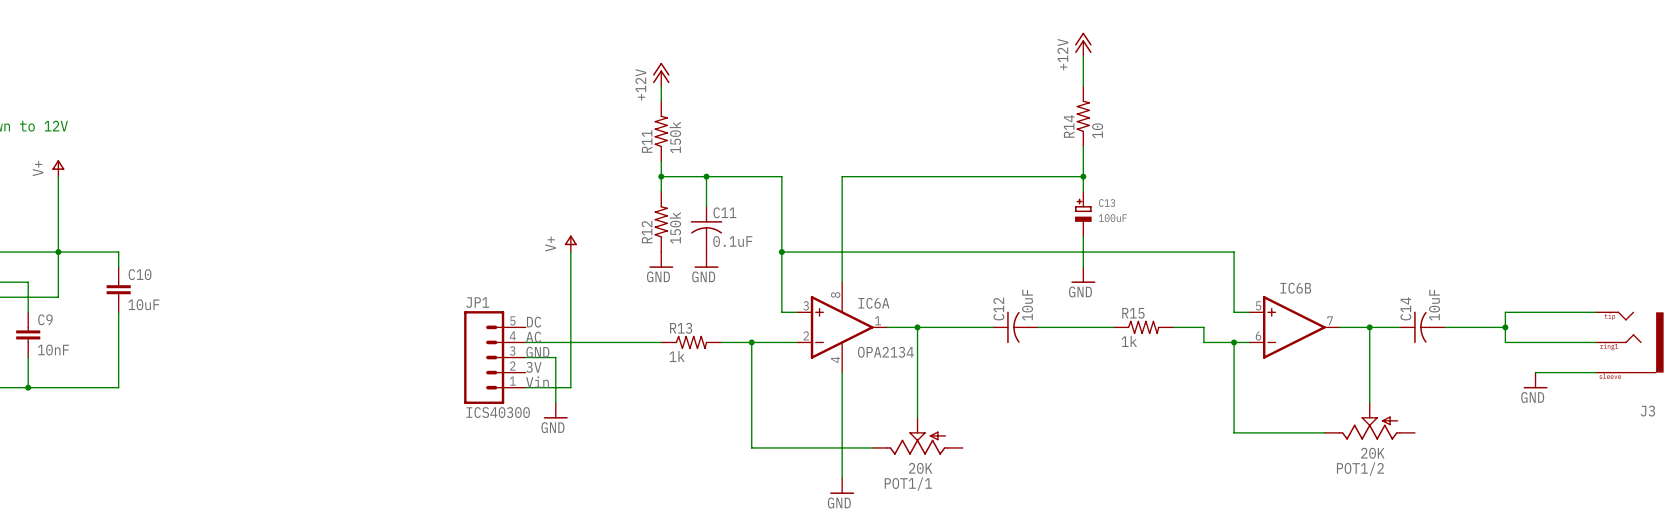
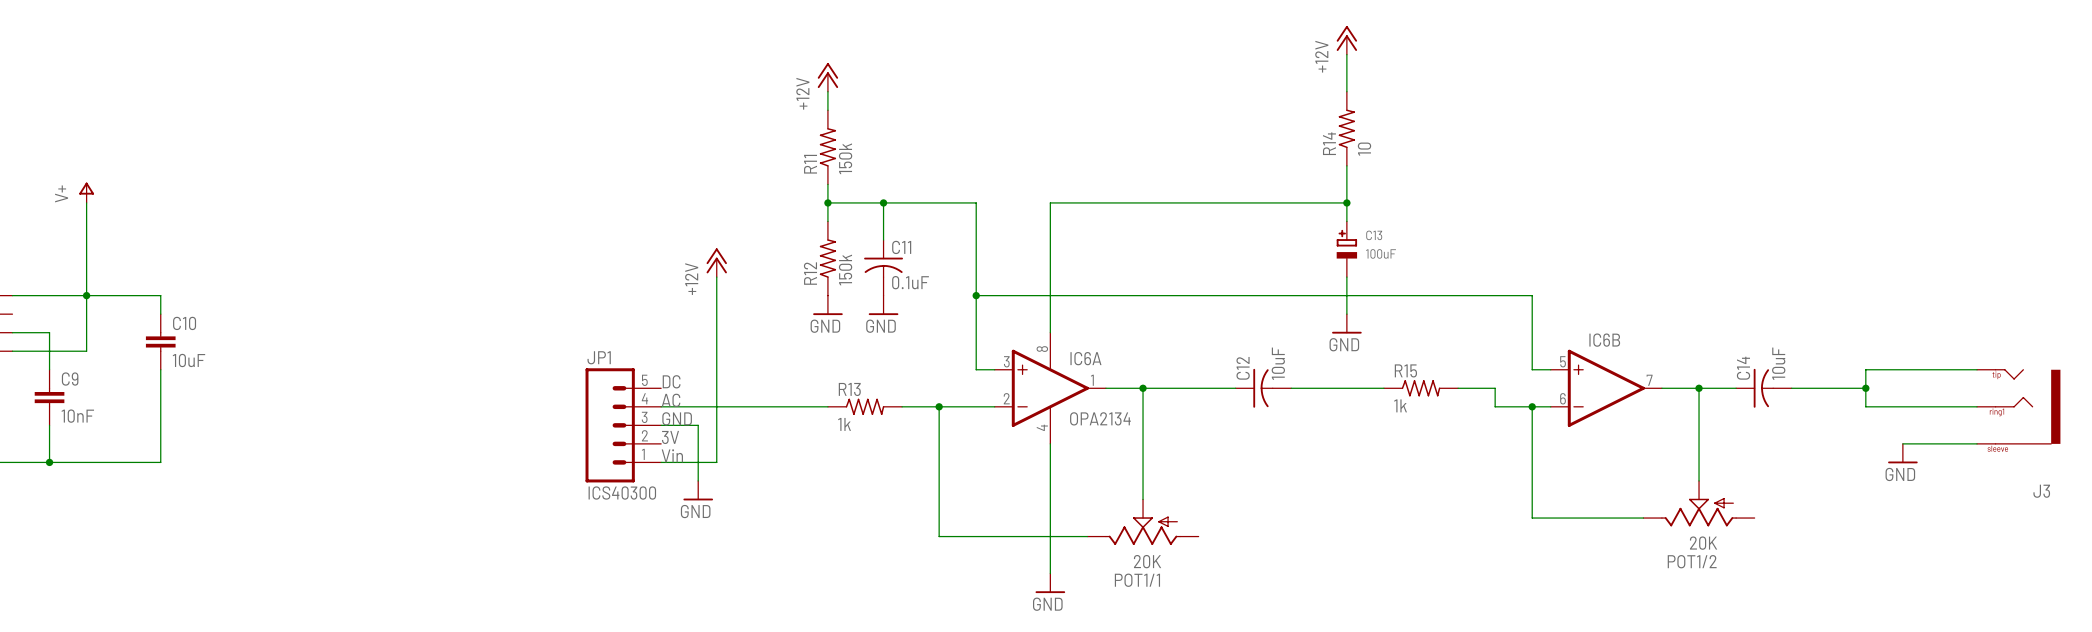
power symbol: none -> +12V (716, 262)
power symbol: V+ (570, 243) -> none

